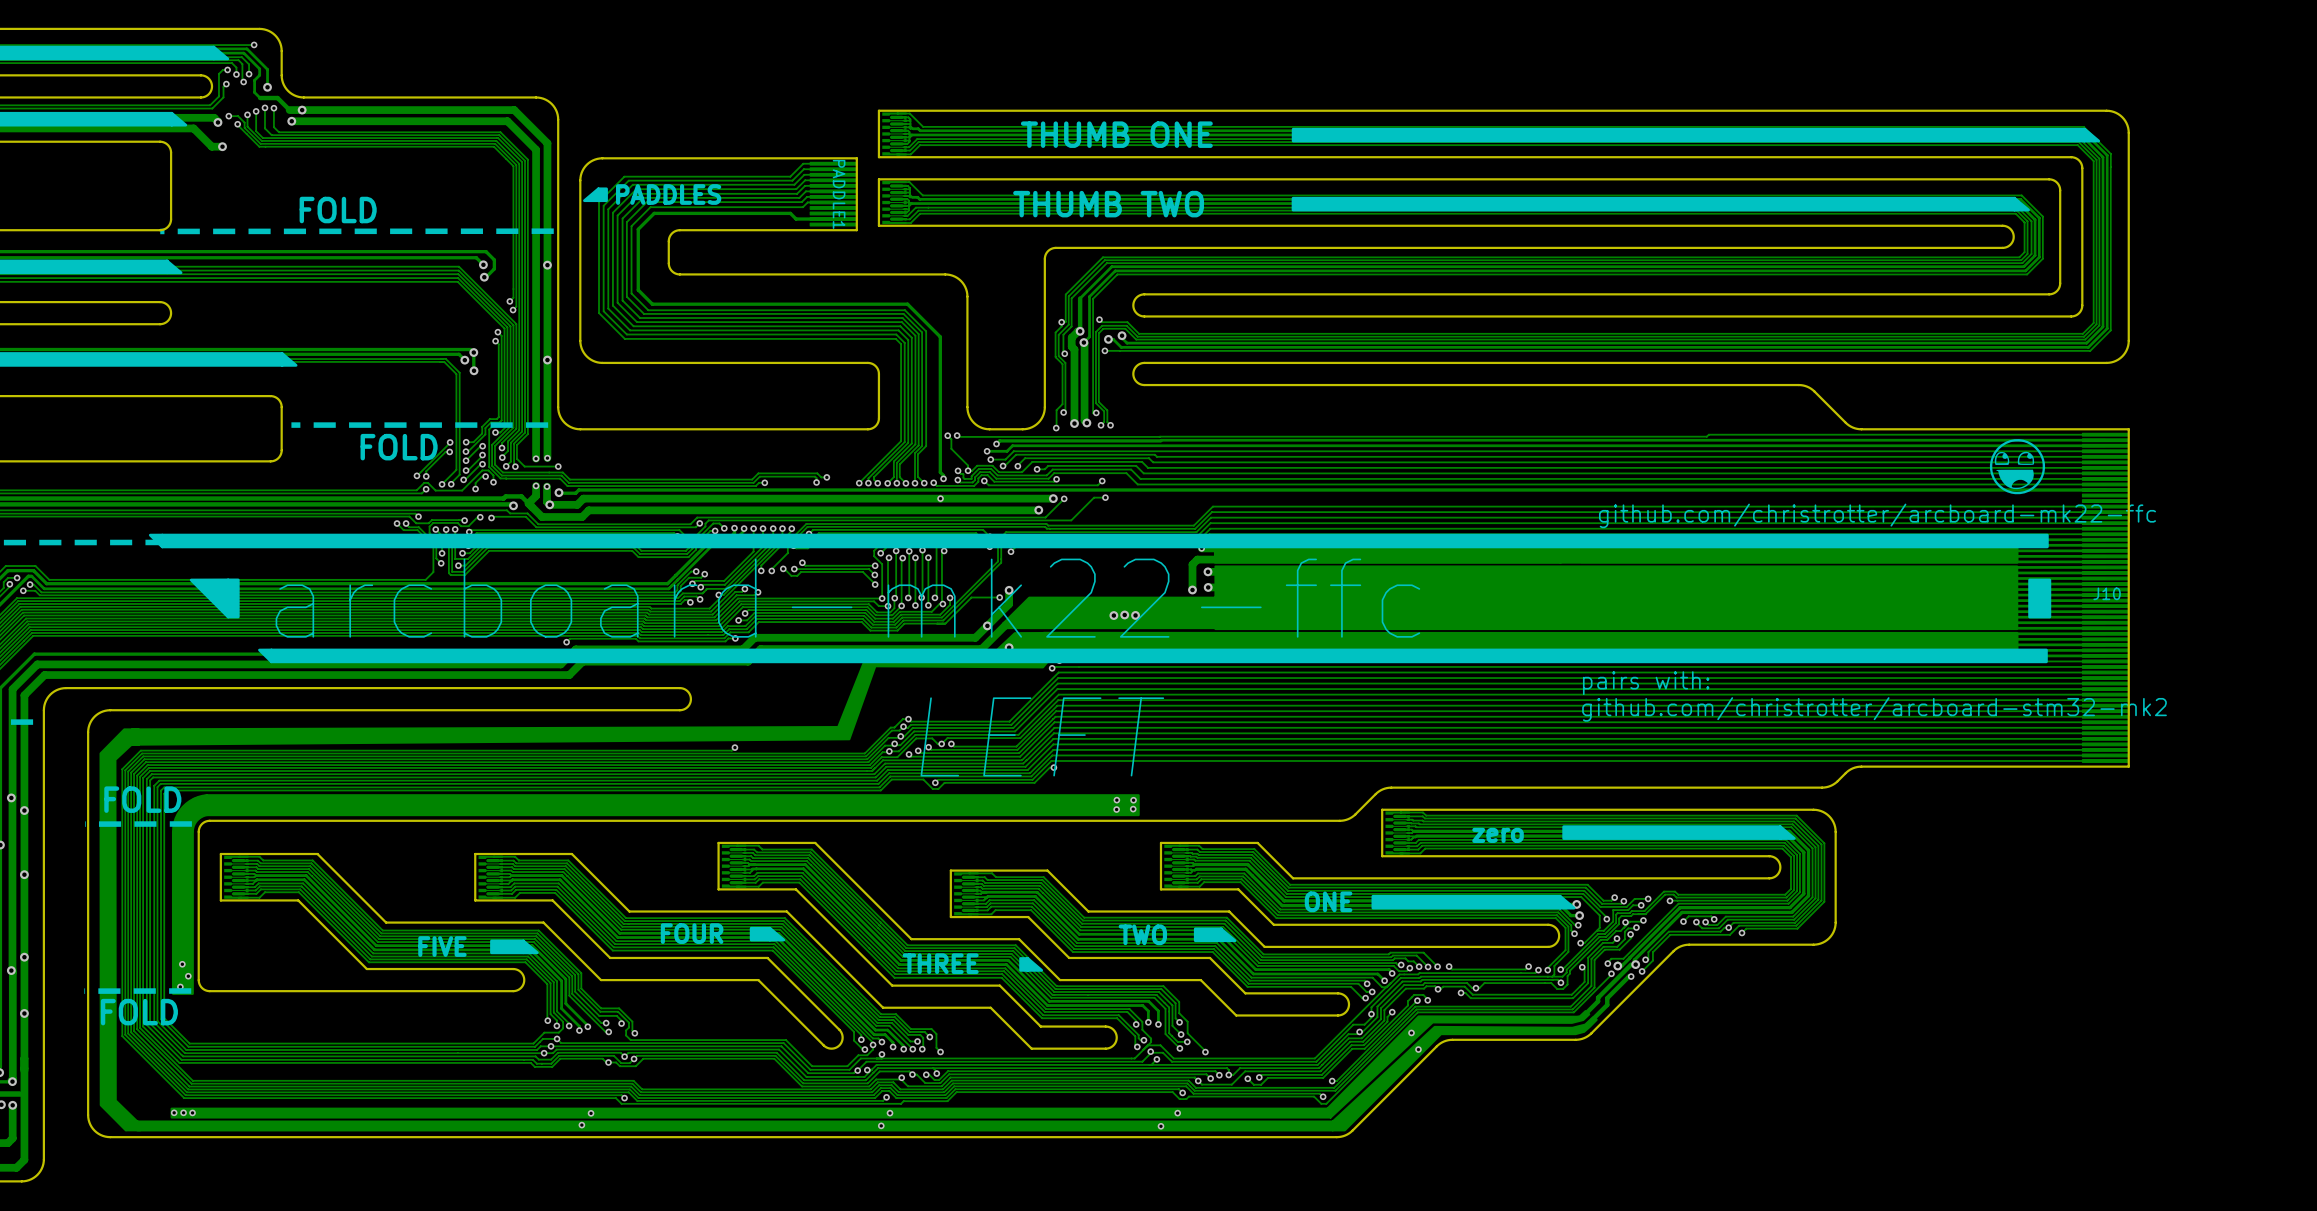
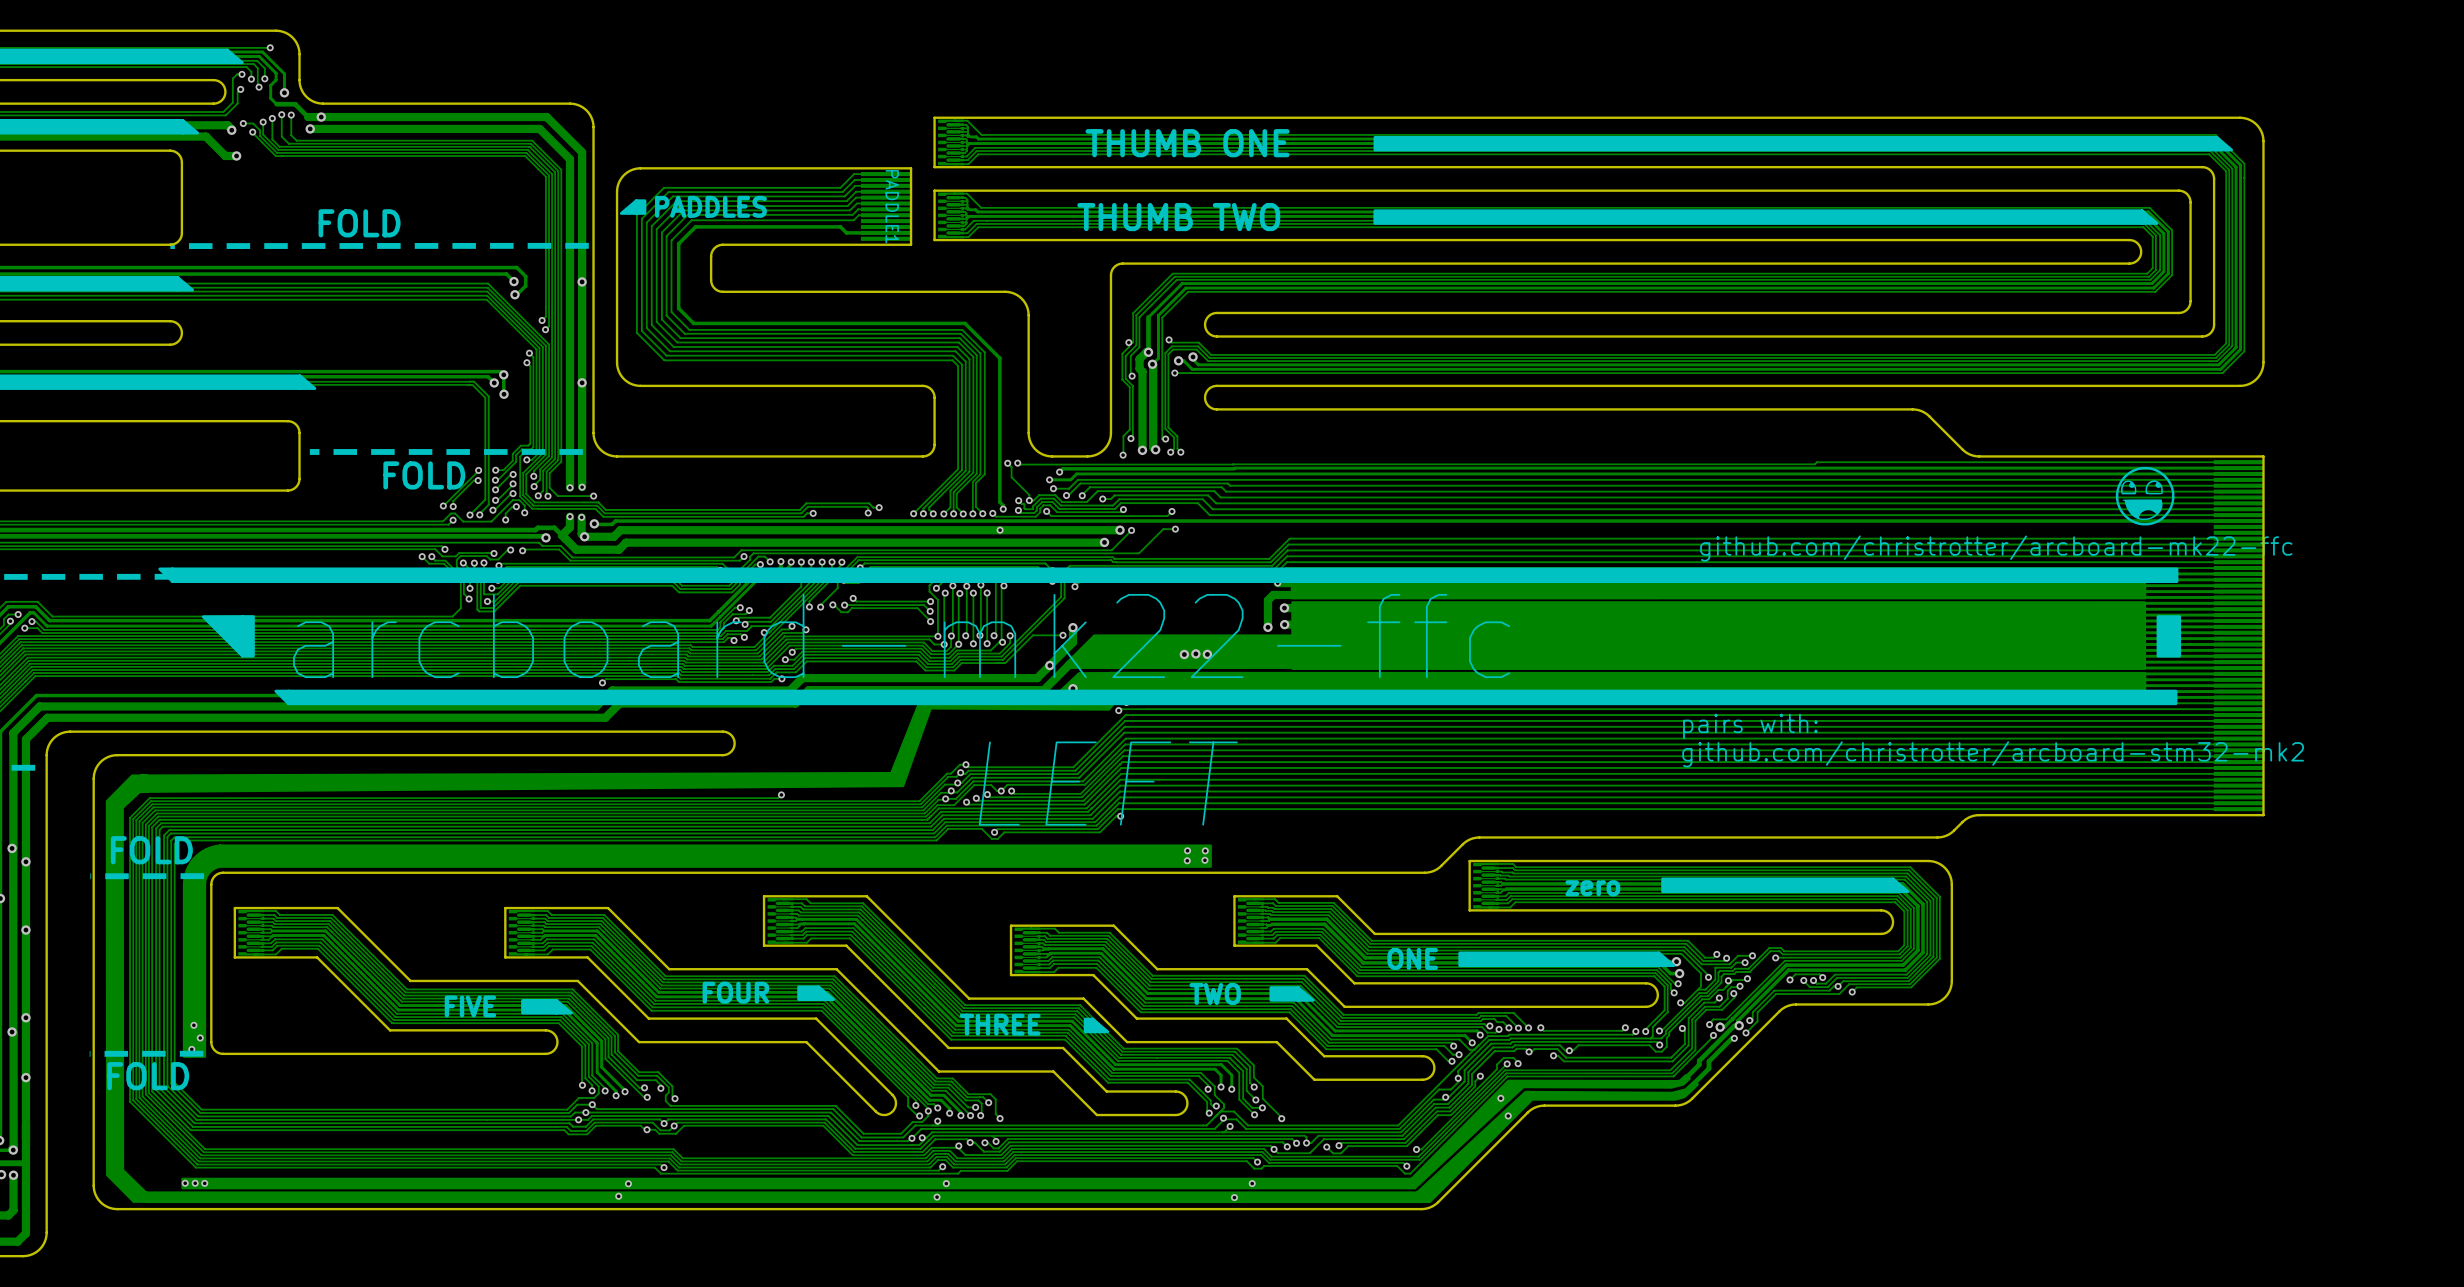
J10 name: J10 (2107, 593) -> none

